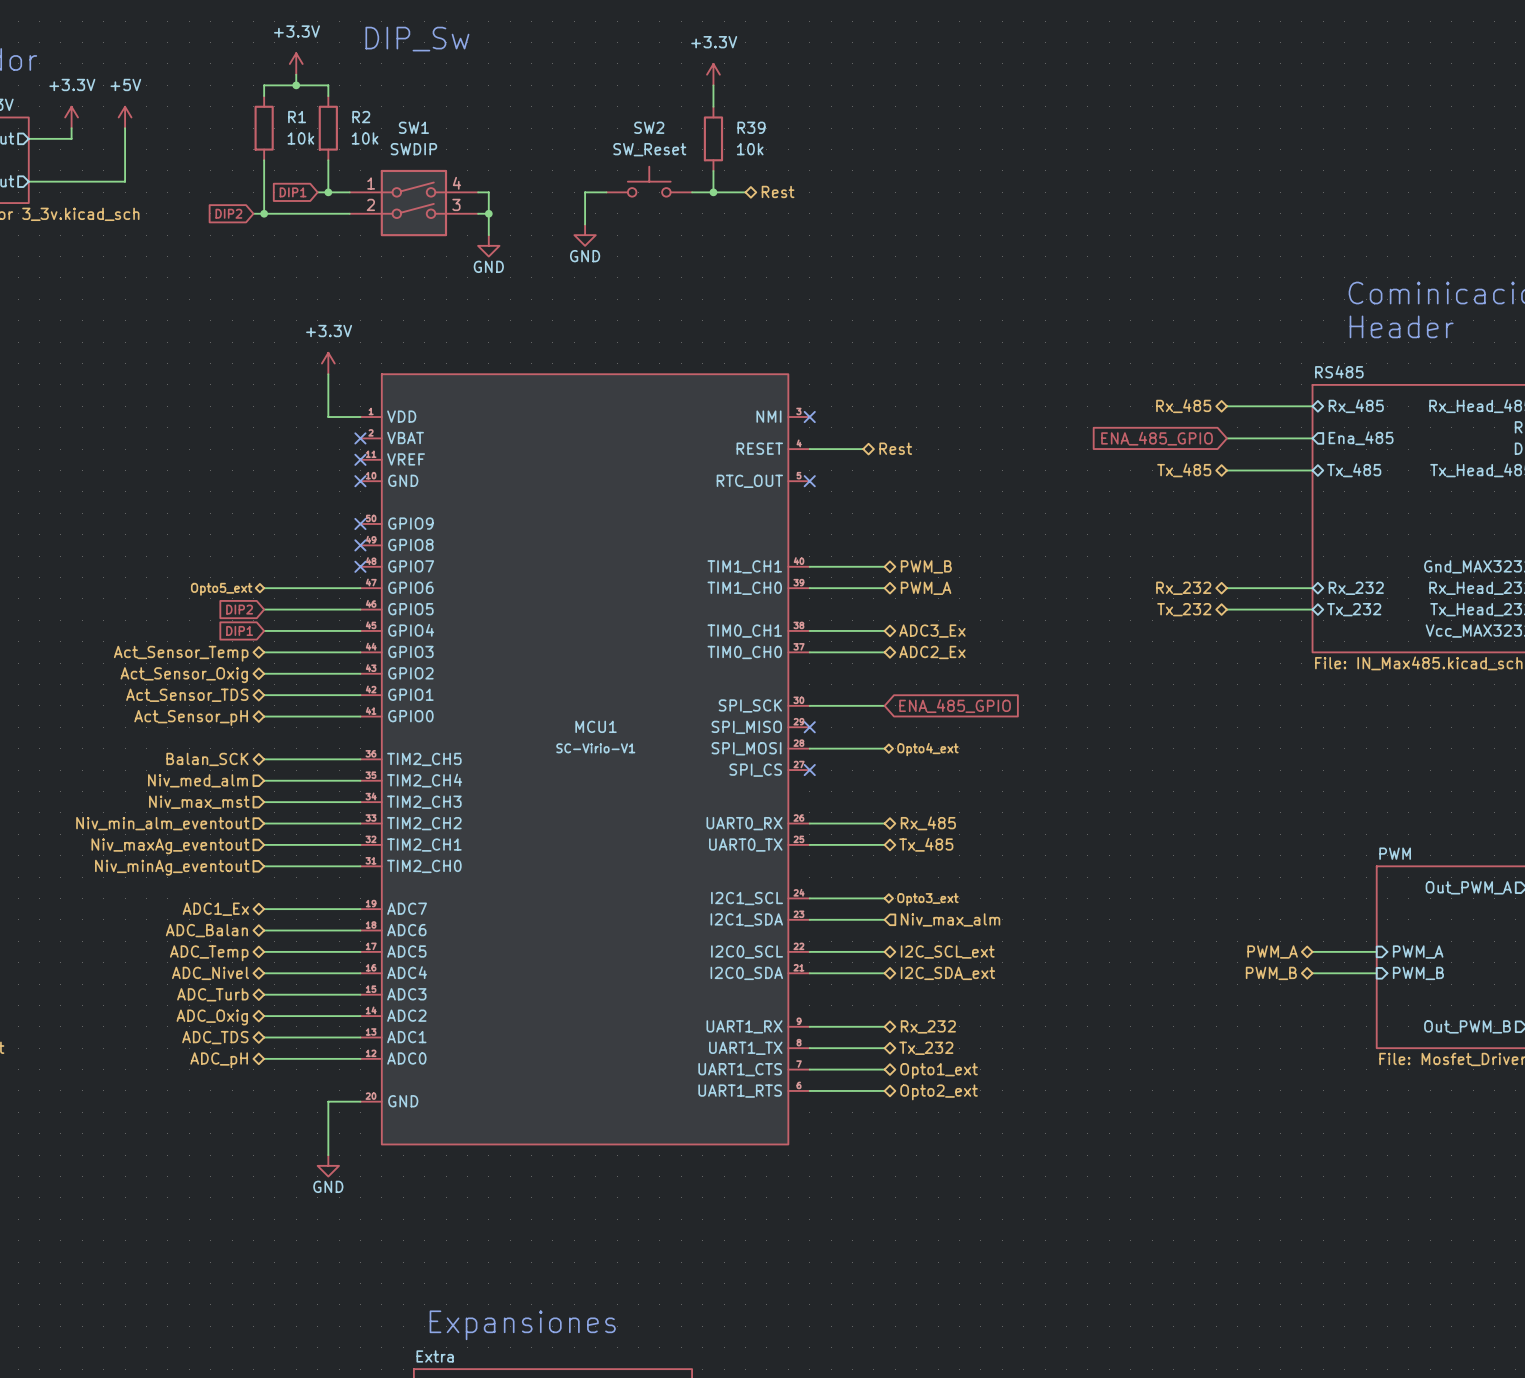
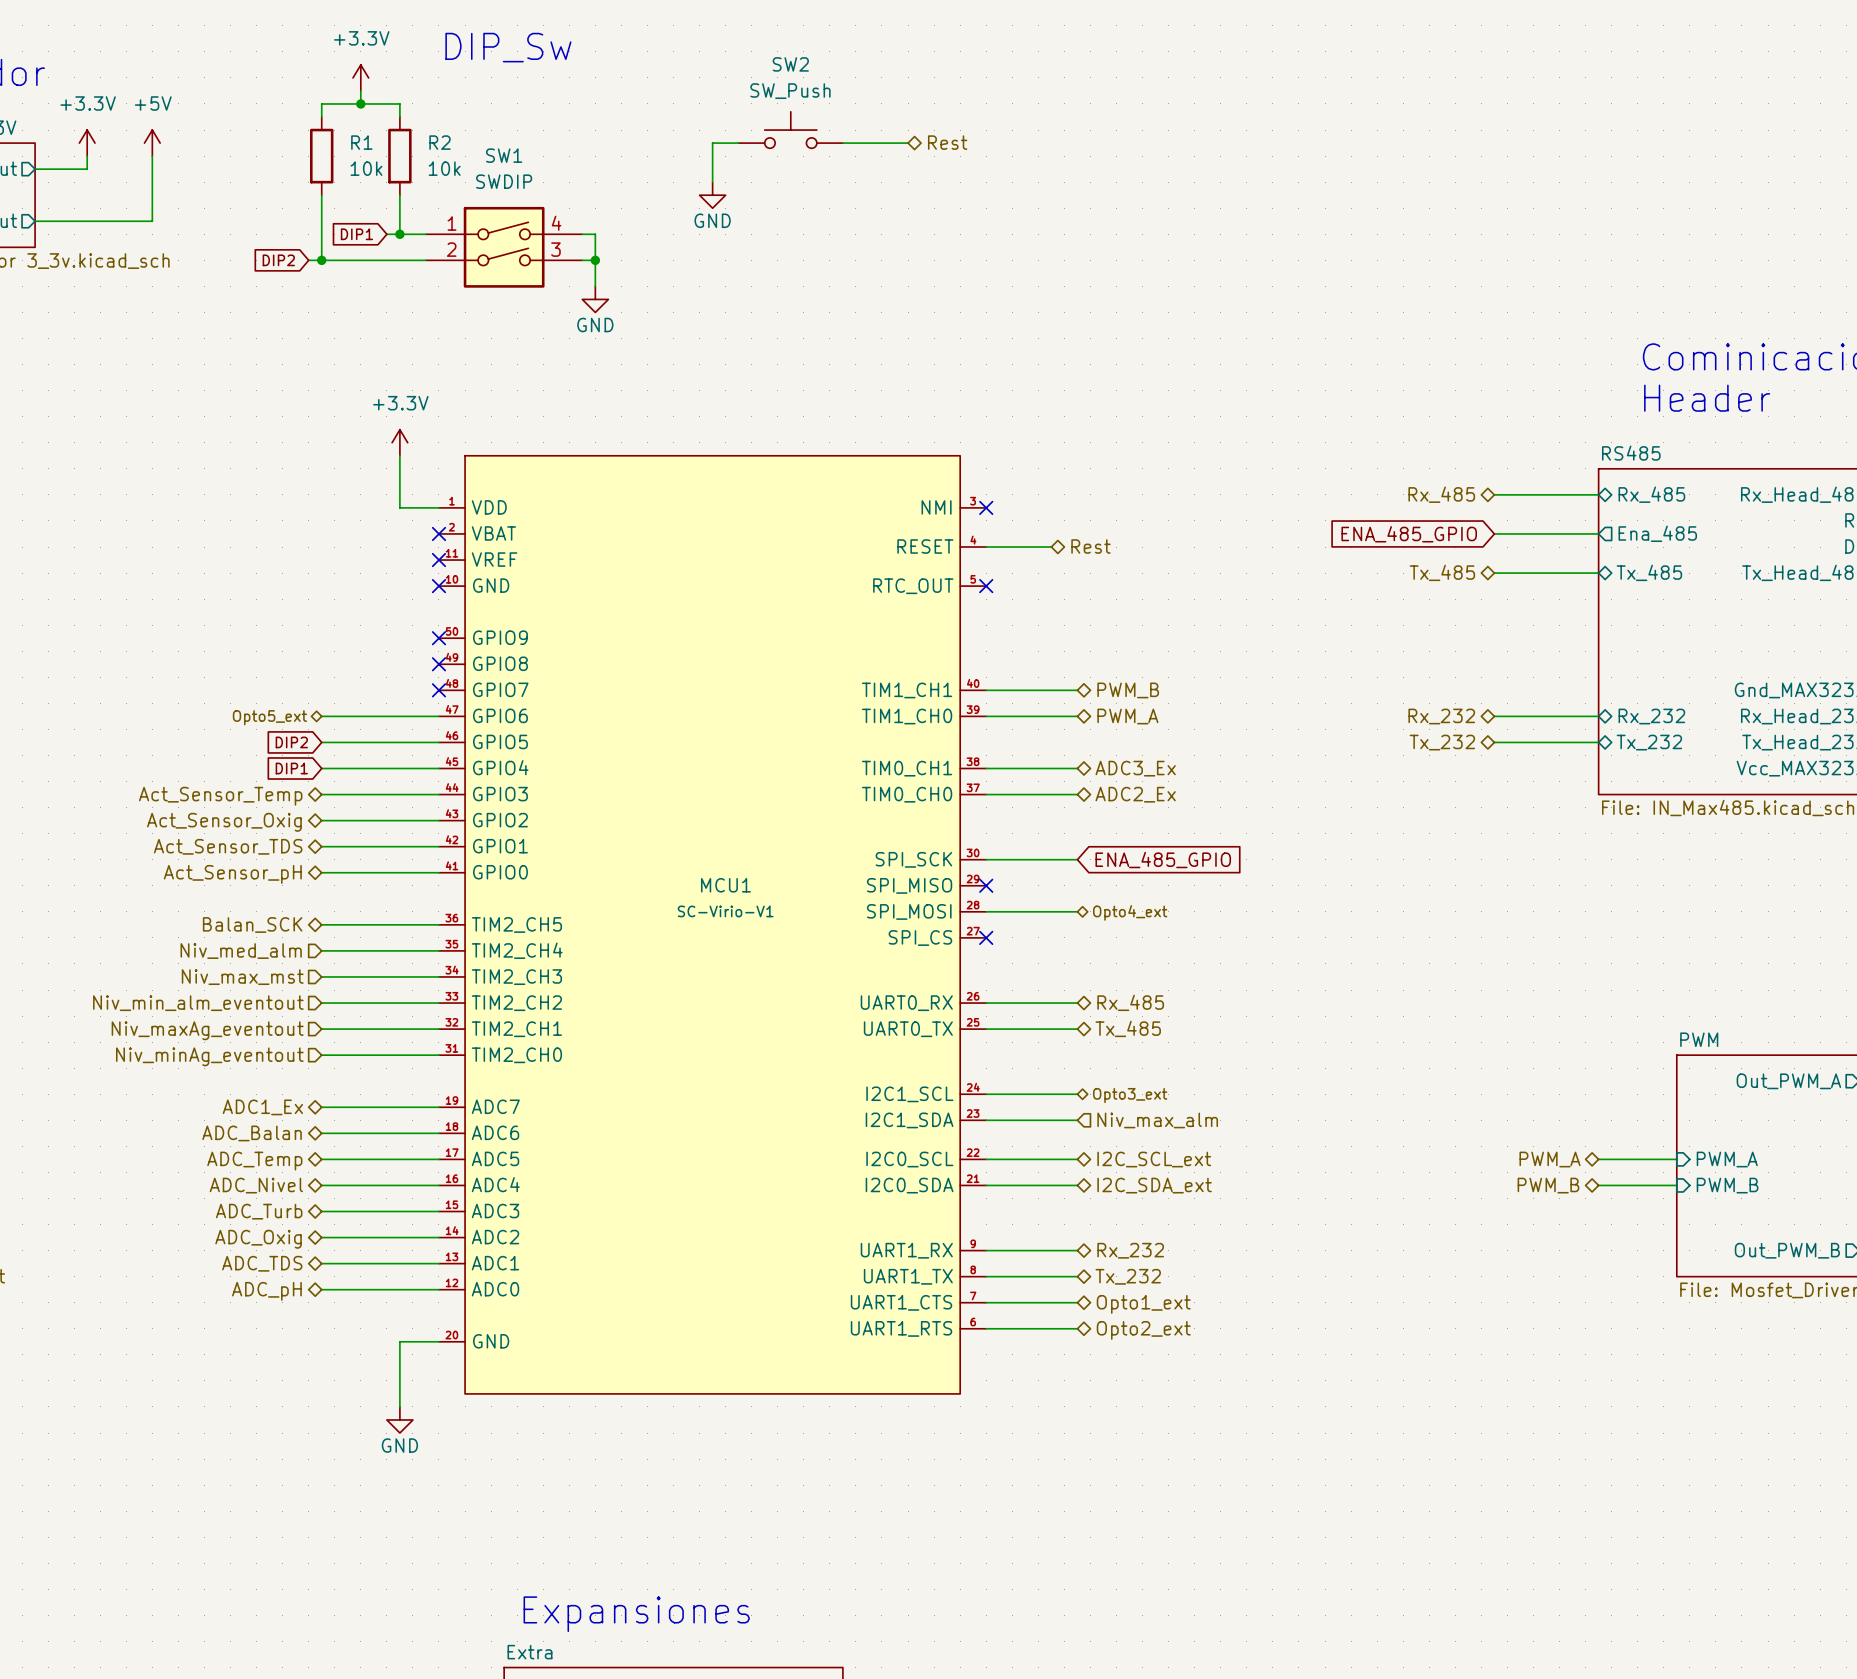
power symbol: +3.3V (713, 74) -> none
wire: (713, 85) (713, 106) -> none
R39: 10k (713, 138) -> none
SW2 value: SW_Reset (649, 149) -> SW_Push (790, 91)
wire: (713, 170) (713, 192) -> none
SW2 position: (649, 181) -> (790, 130)
hierarchical label position: Rest (778, 191) -> Rest (947, 142)
wire: (606, 192) (585, 192) (585, 224) -> (738, 143) (712, 143) (712, 182)
wire: (692, 192) (745, 192) -> (842, 143) (908, 143)
junction: (713, 192) -> none
power symbol position: GND (585, 235) -> GND (712, 195)

